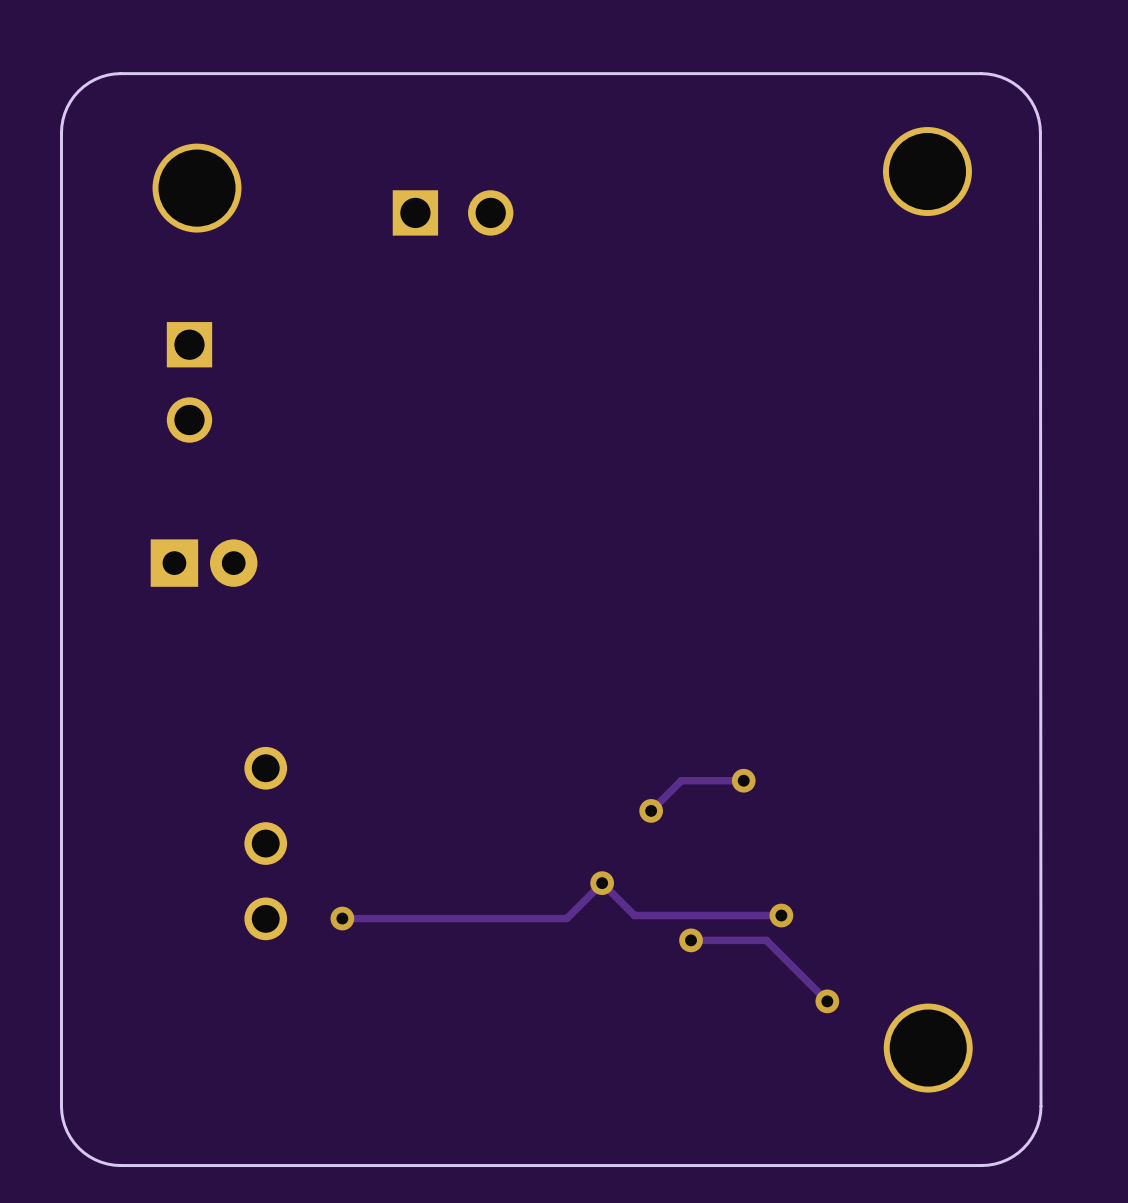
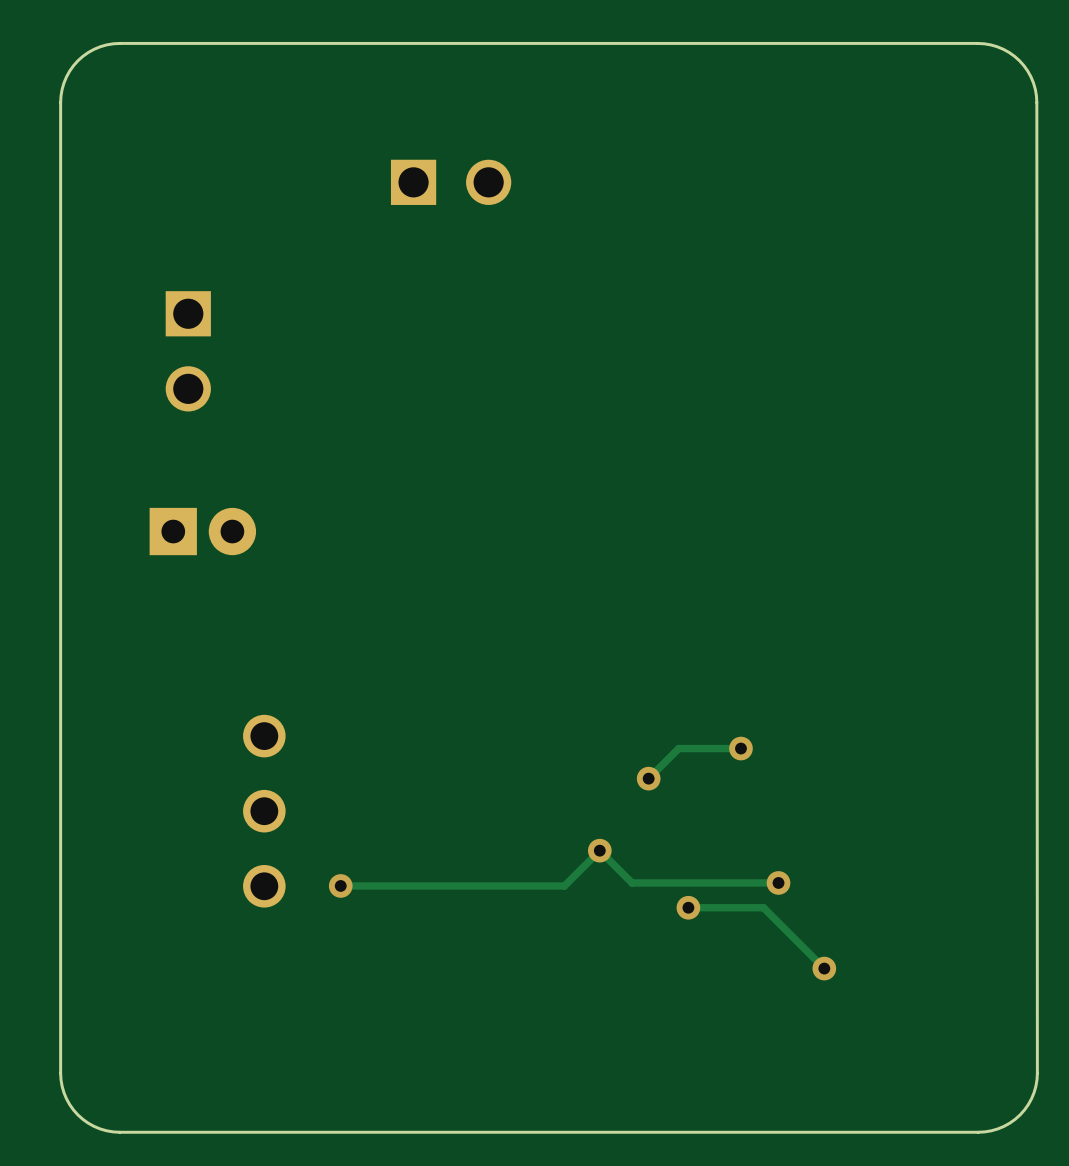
part: (927, 171) -> none
part: (197, 188) -> none
part: (928, 1048) -> none

